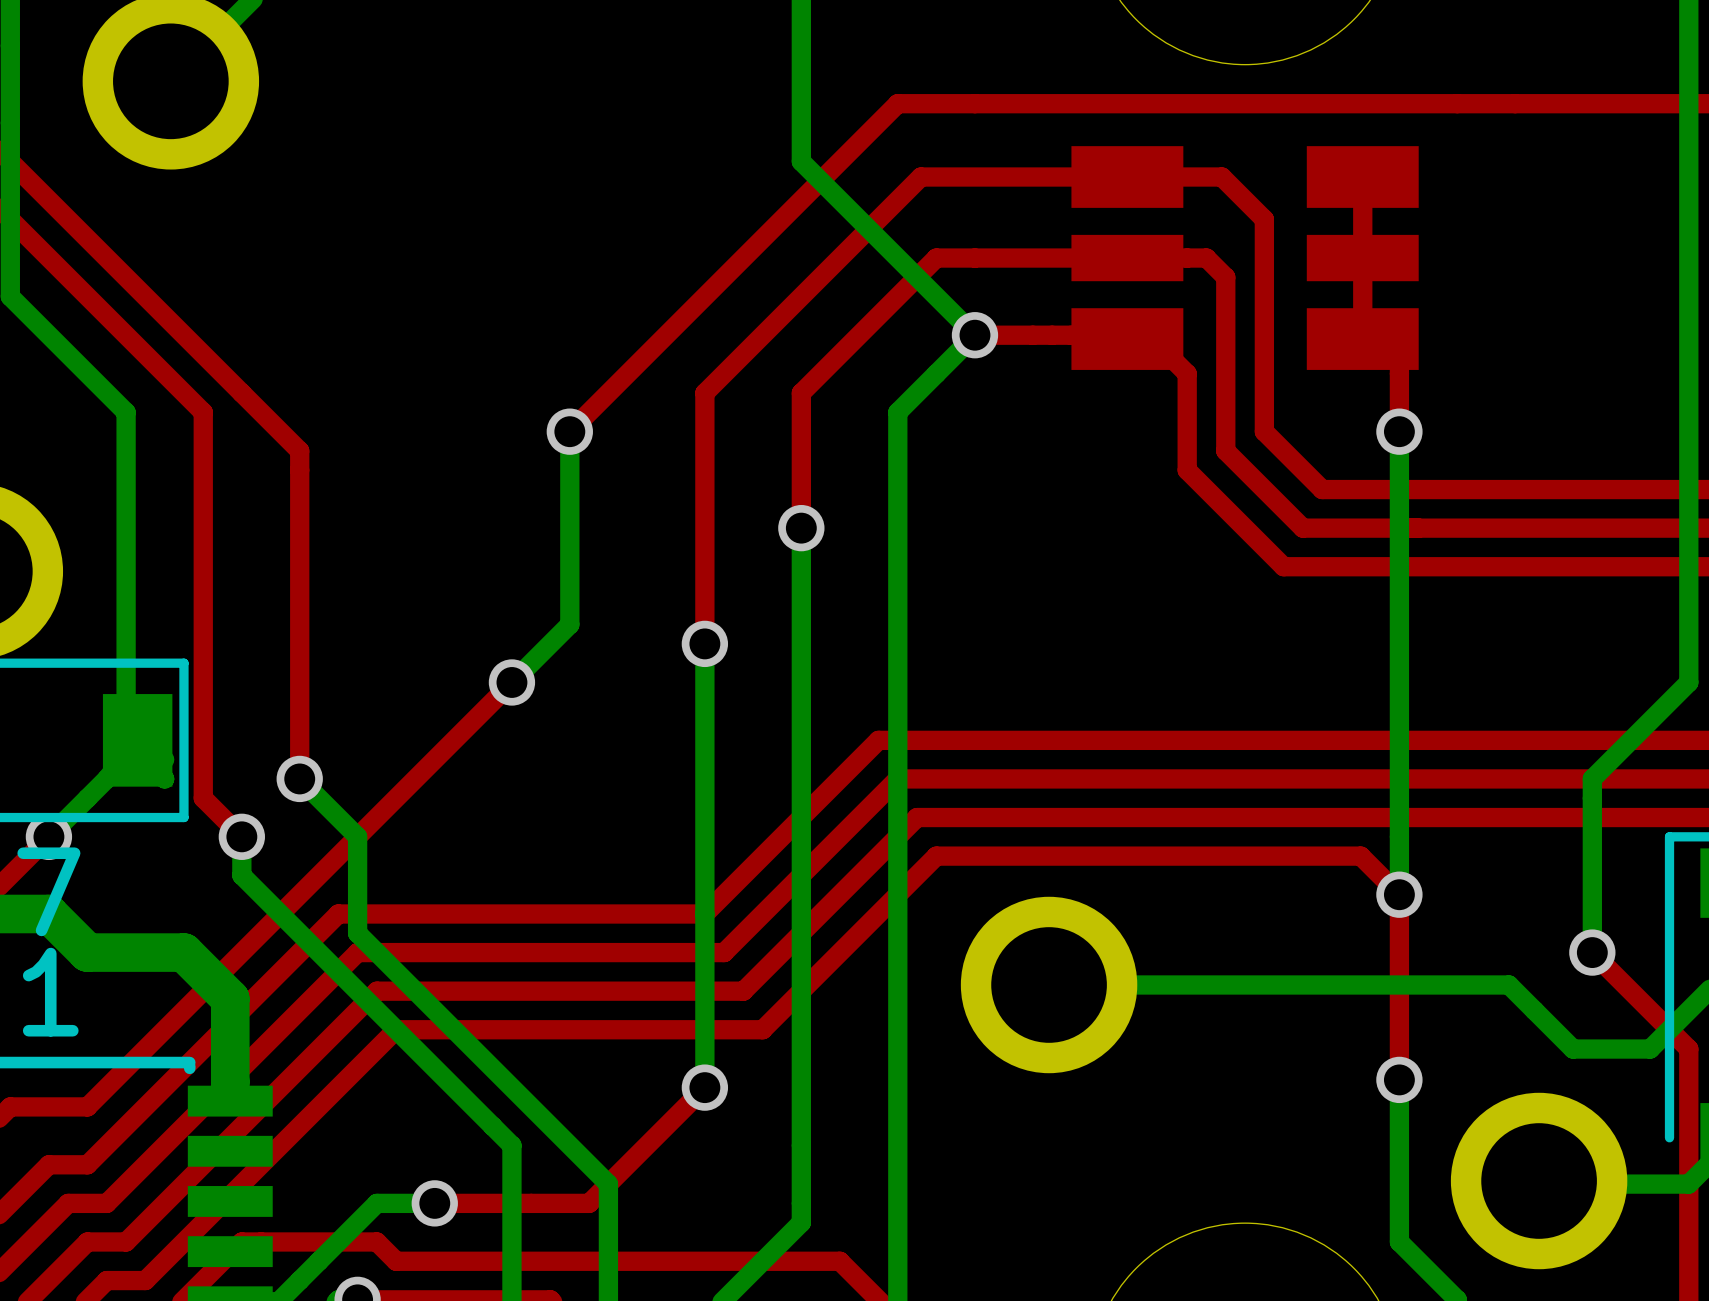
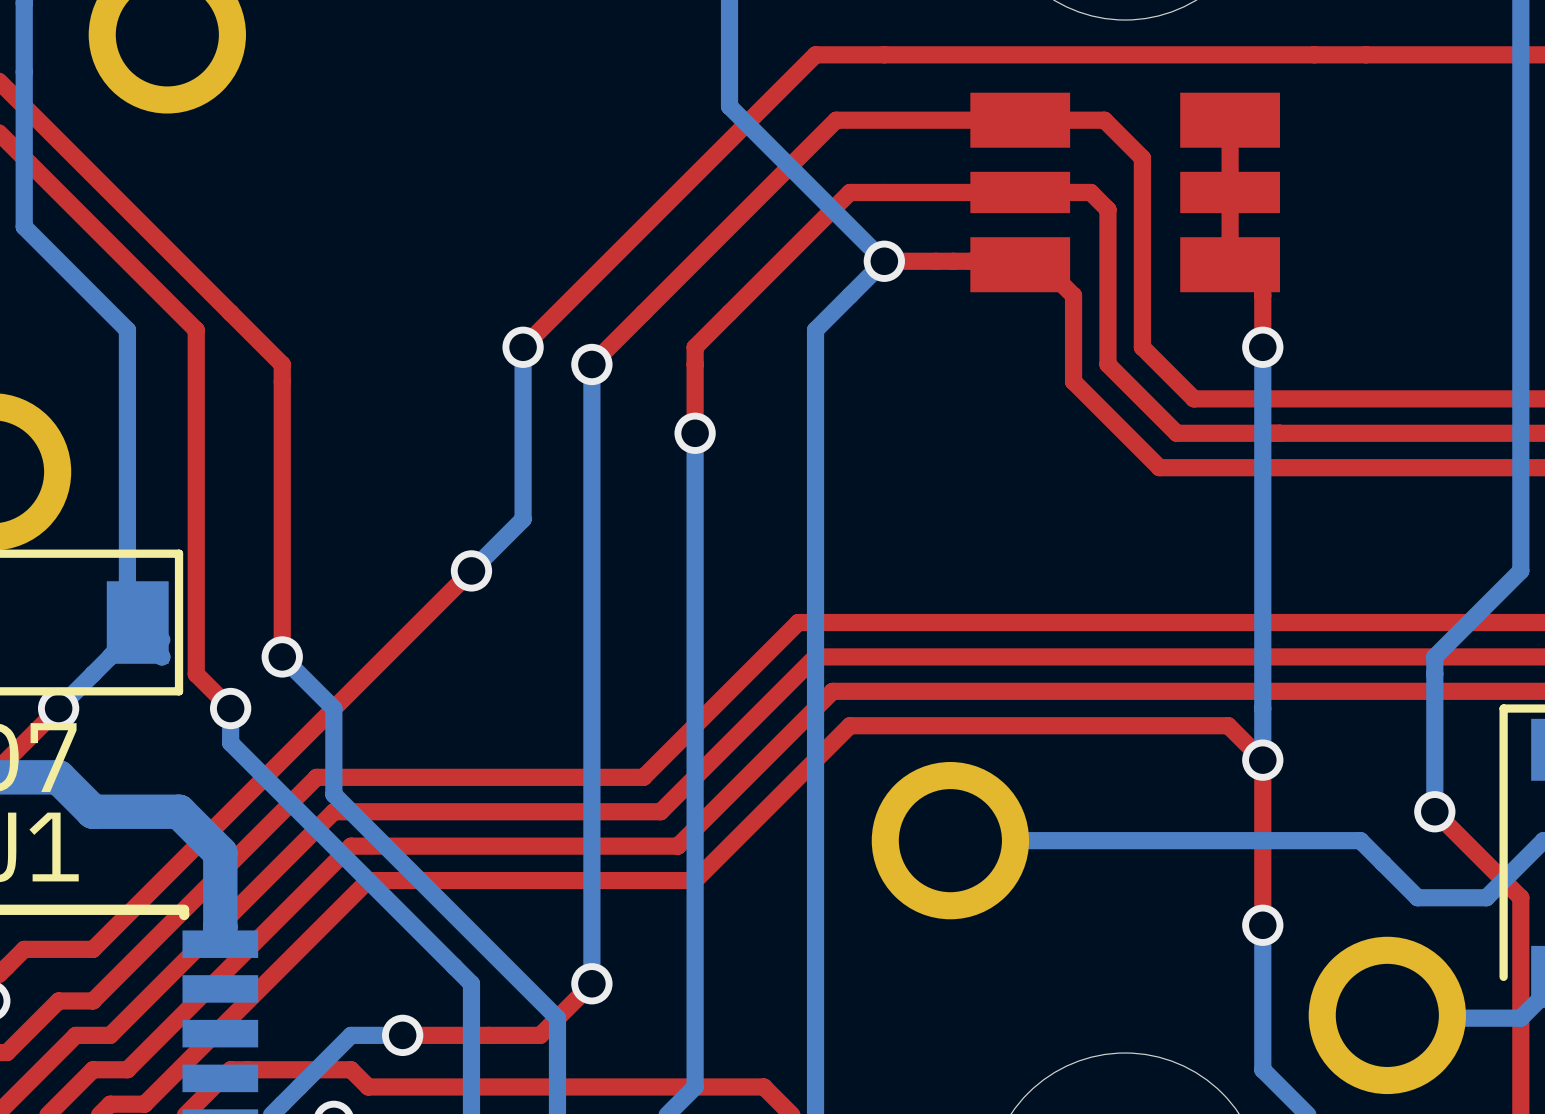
top track: (704, 393) (704, 643) -> (643, 312) (591, 364)
top track: (801, 393) (801, 528) -> (729, 312) (695, 347) (695, 433)
bottom track: none -> (591, 364) (591, 983)
via: none -> (591, 364)
bottom track: (801, 528) (801, 1222) (762, 1261) -> (695, 433) (695, 1086)
via position: (801, 528) -> (695, 433)
bottom track: (704, 643) (704, 1087) -> none
via: (704, 643) -> none
top track: (704, 1087) (647, 1145) -> none
via position: (704, 1087) -> (591, 983)

